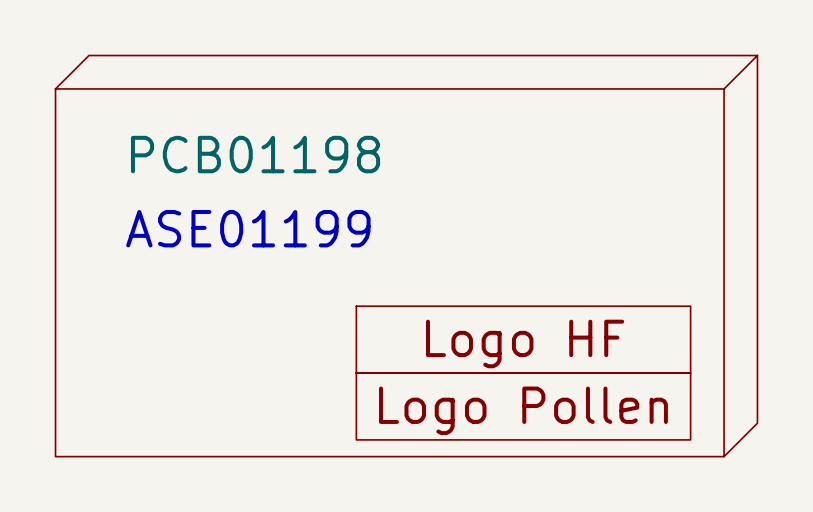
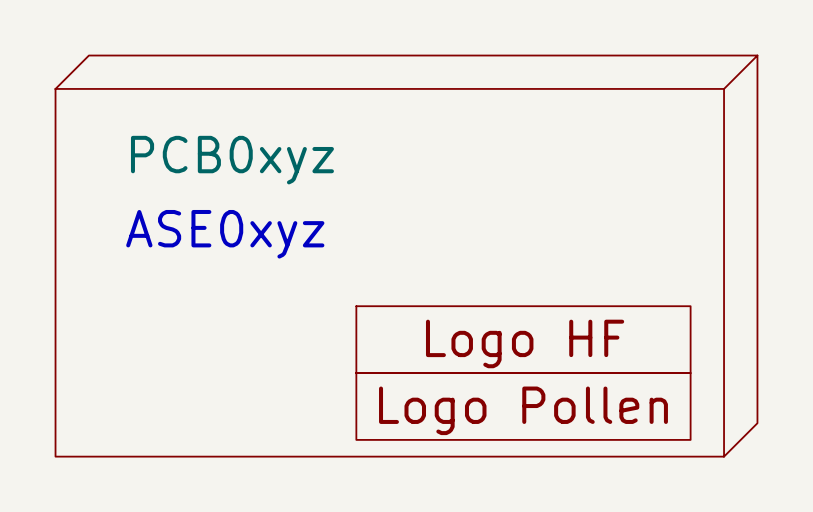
part value: PCB01198 (255, 154) -> PCB0xyz (232, 160)
text: ASE01199 (248, 228) -> ASE0xyz (225, 234)

